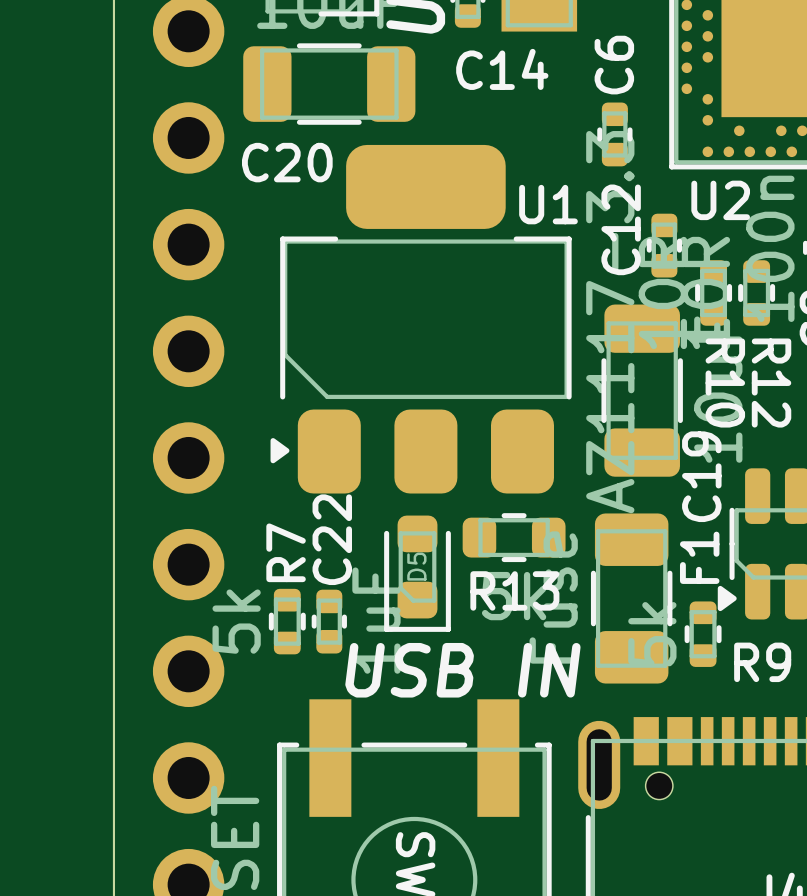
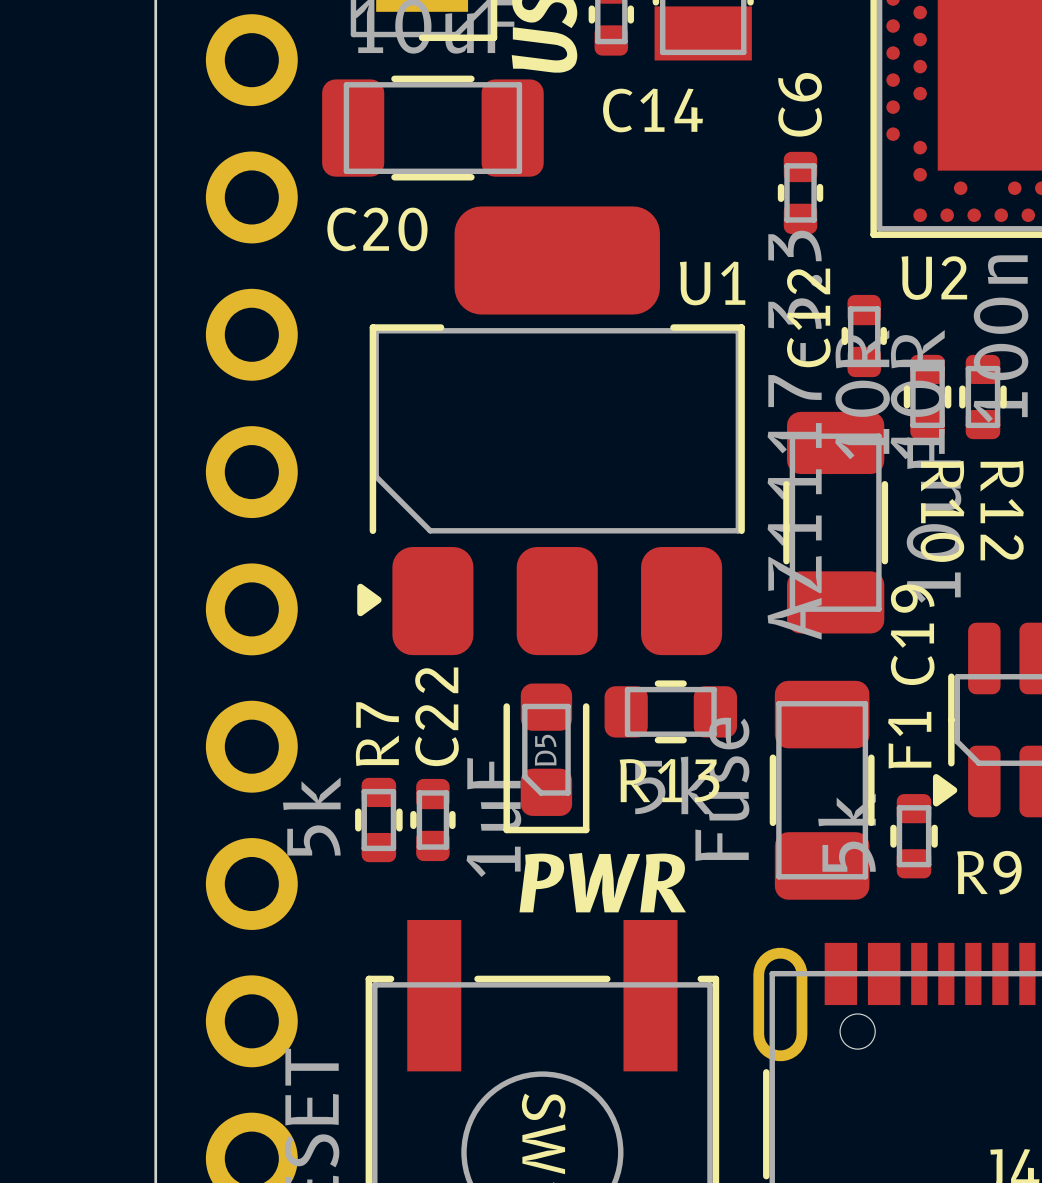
D5 value: USB IN (462, 670) -> PWR (602, 882)

